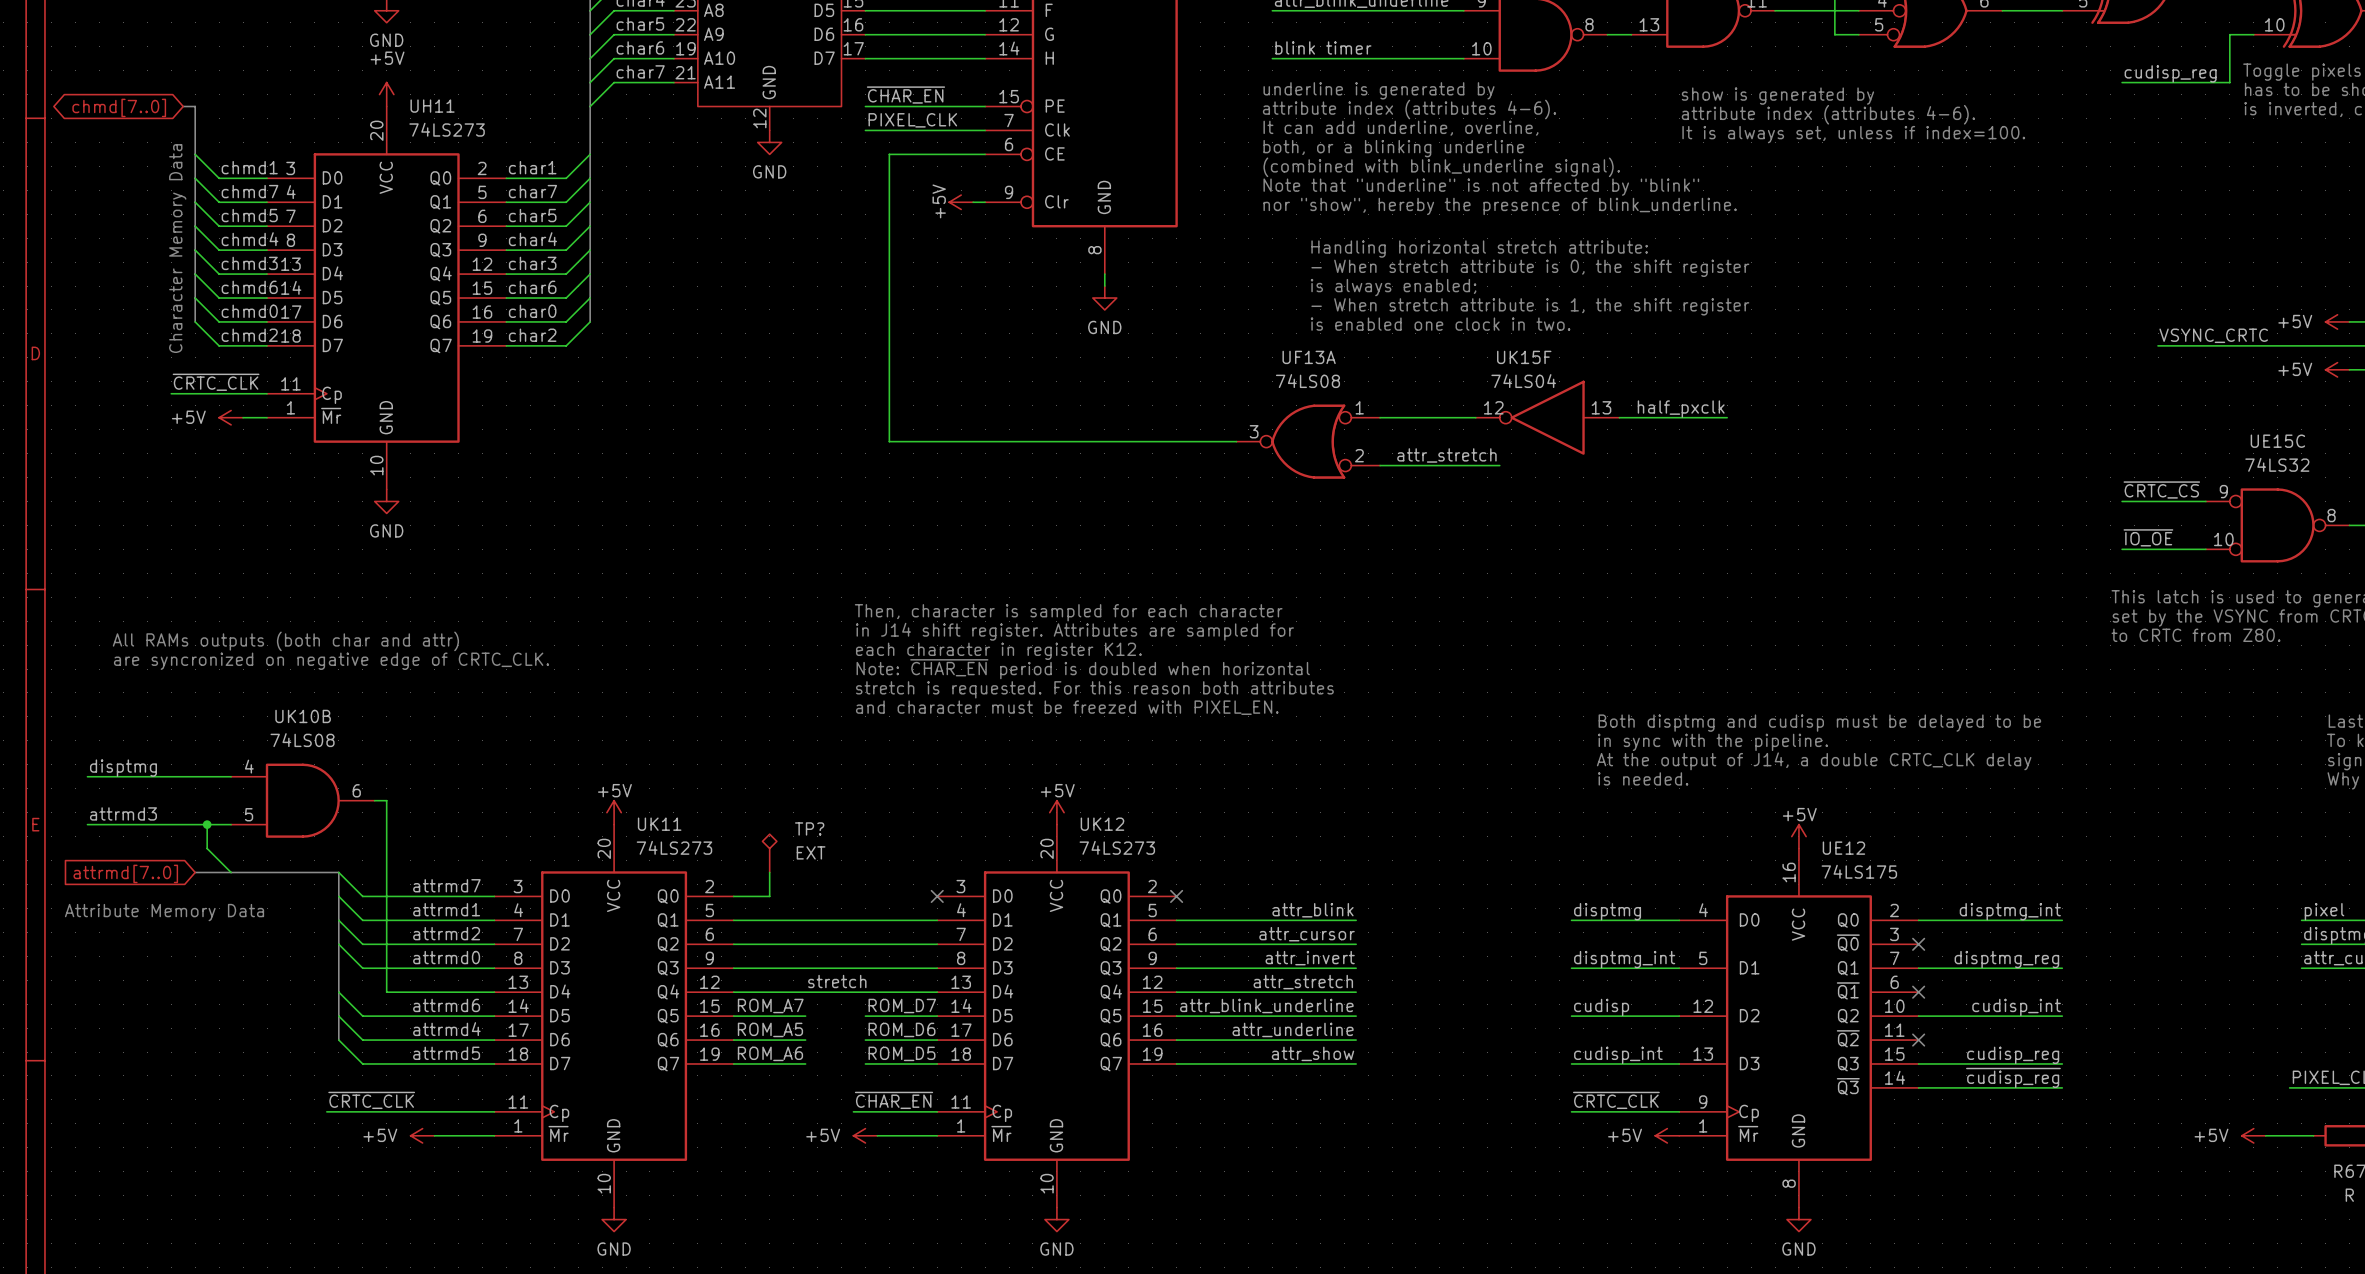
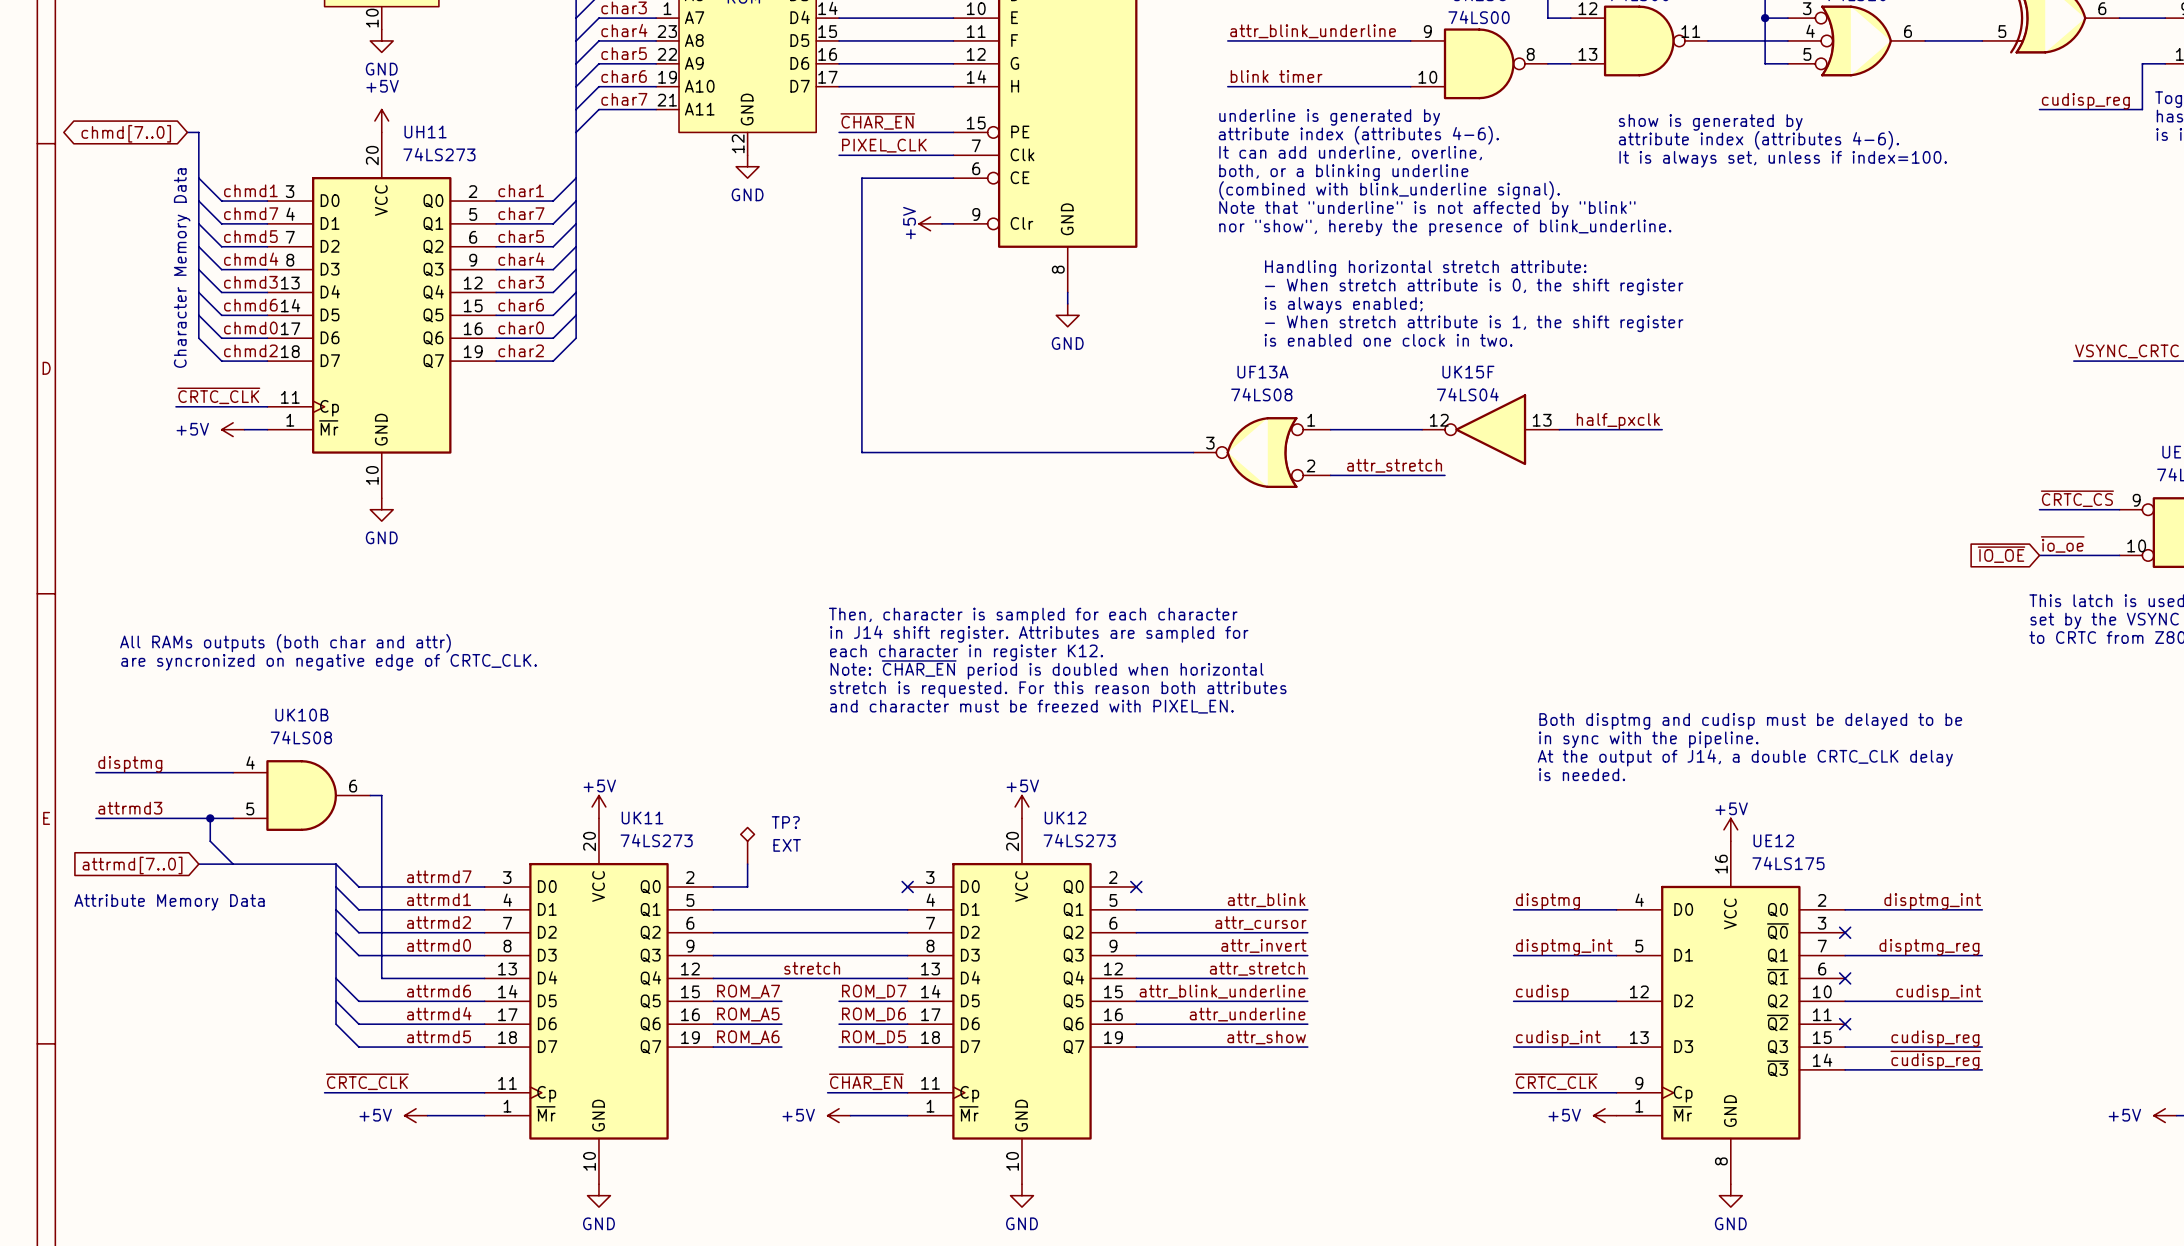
label: ~{IO_OE} (2148, 537) -> ~{io_oe} (2062, 544)
global label: none -> ~{IO_OE} (2001, 554)

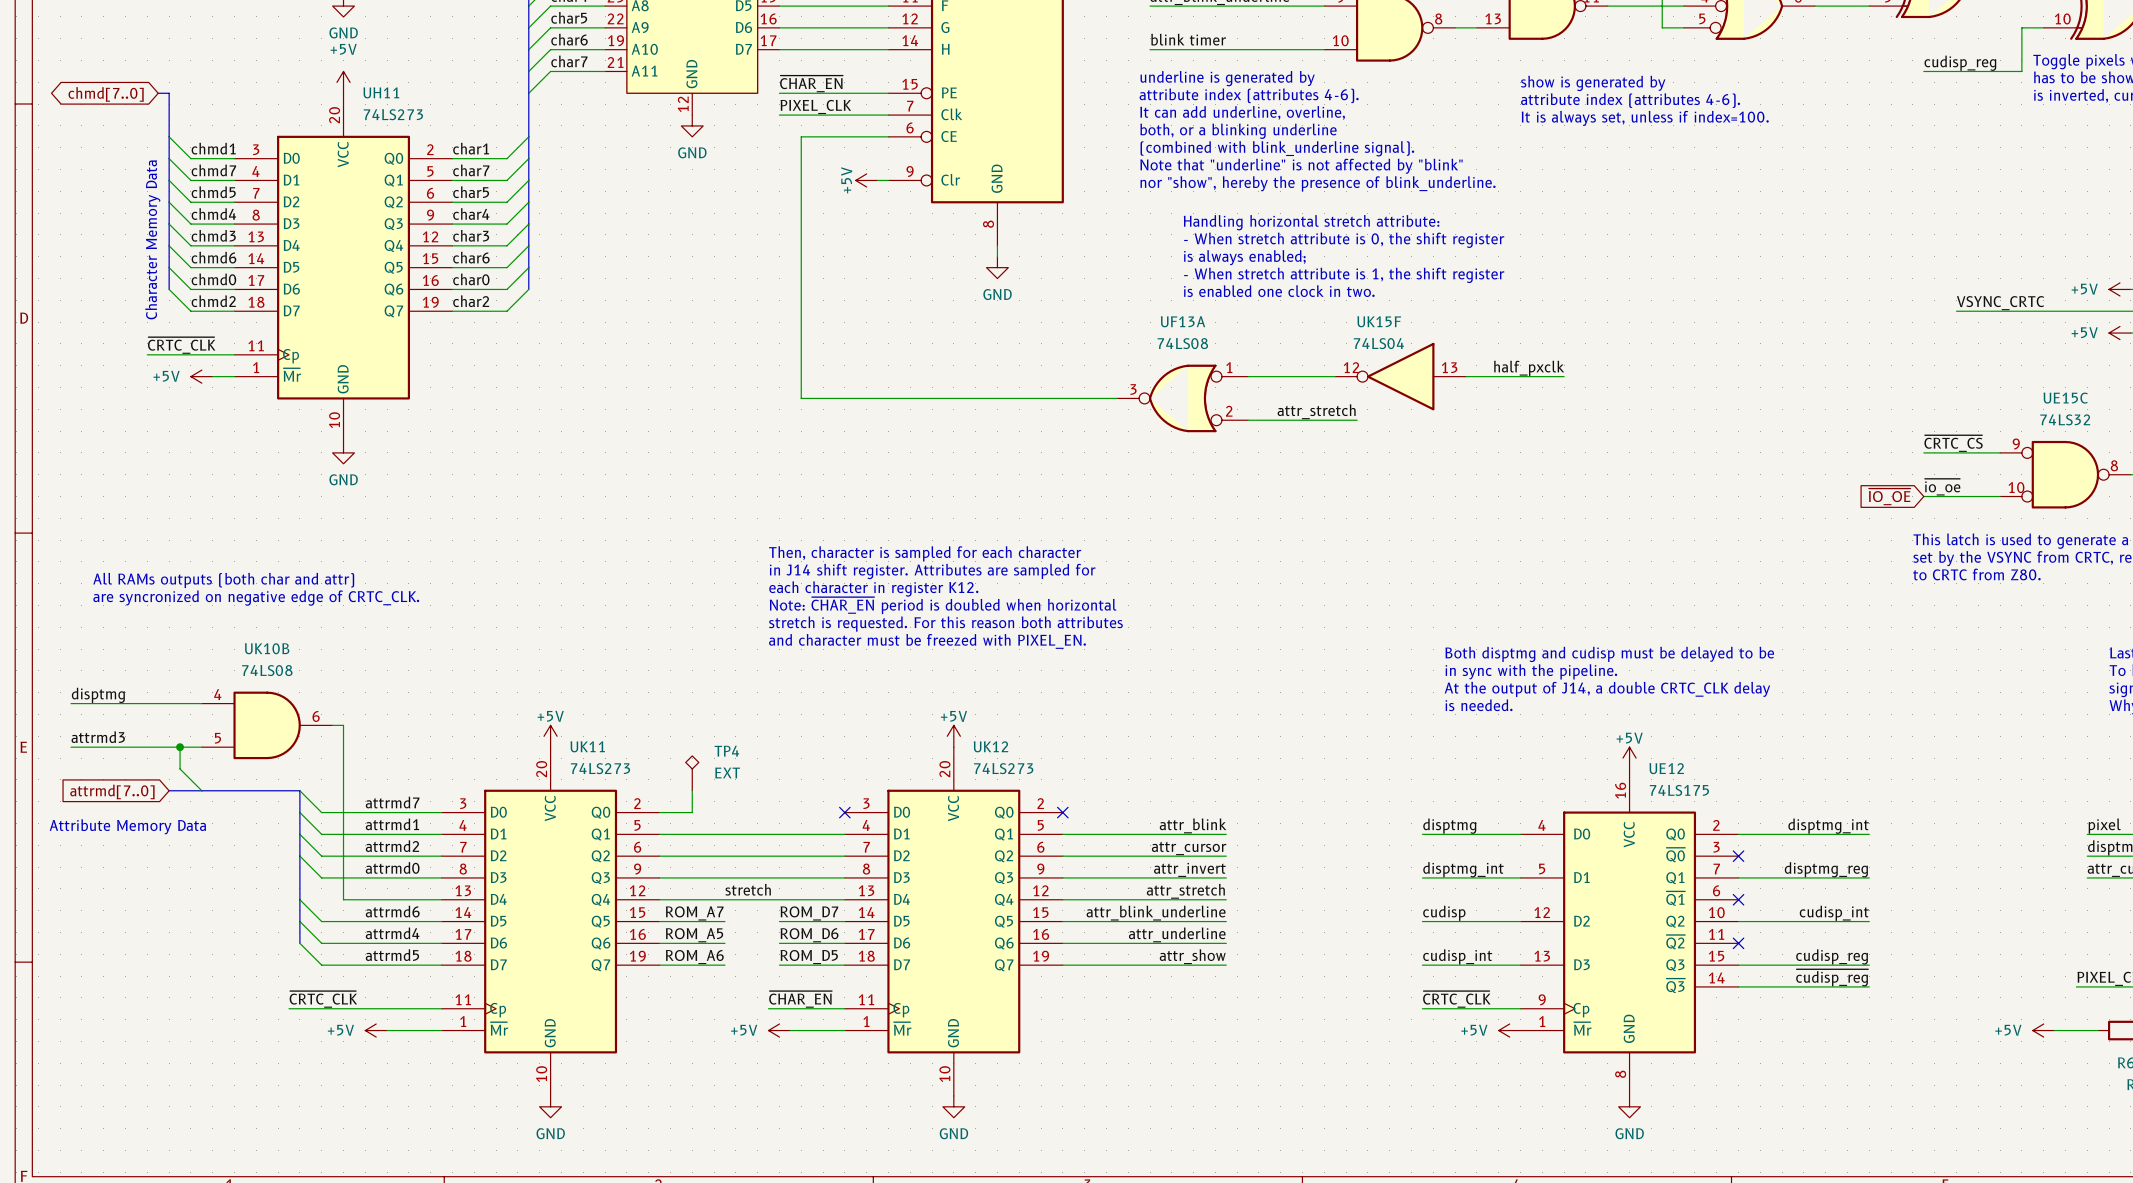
TP? name: TP? (785, 822) -> TP4 (726, 751)

